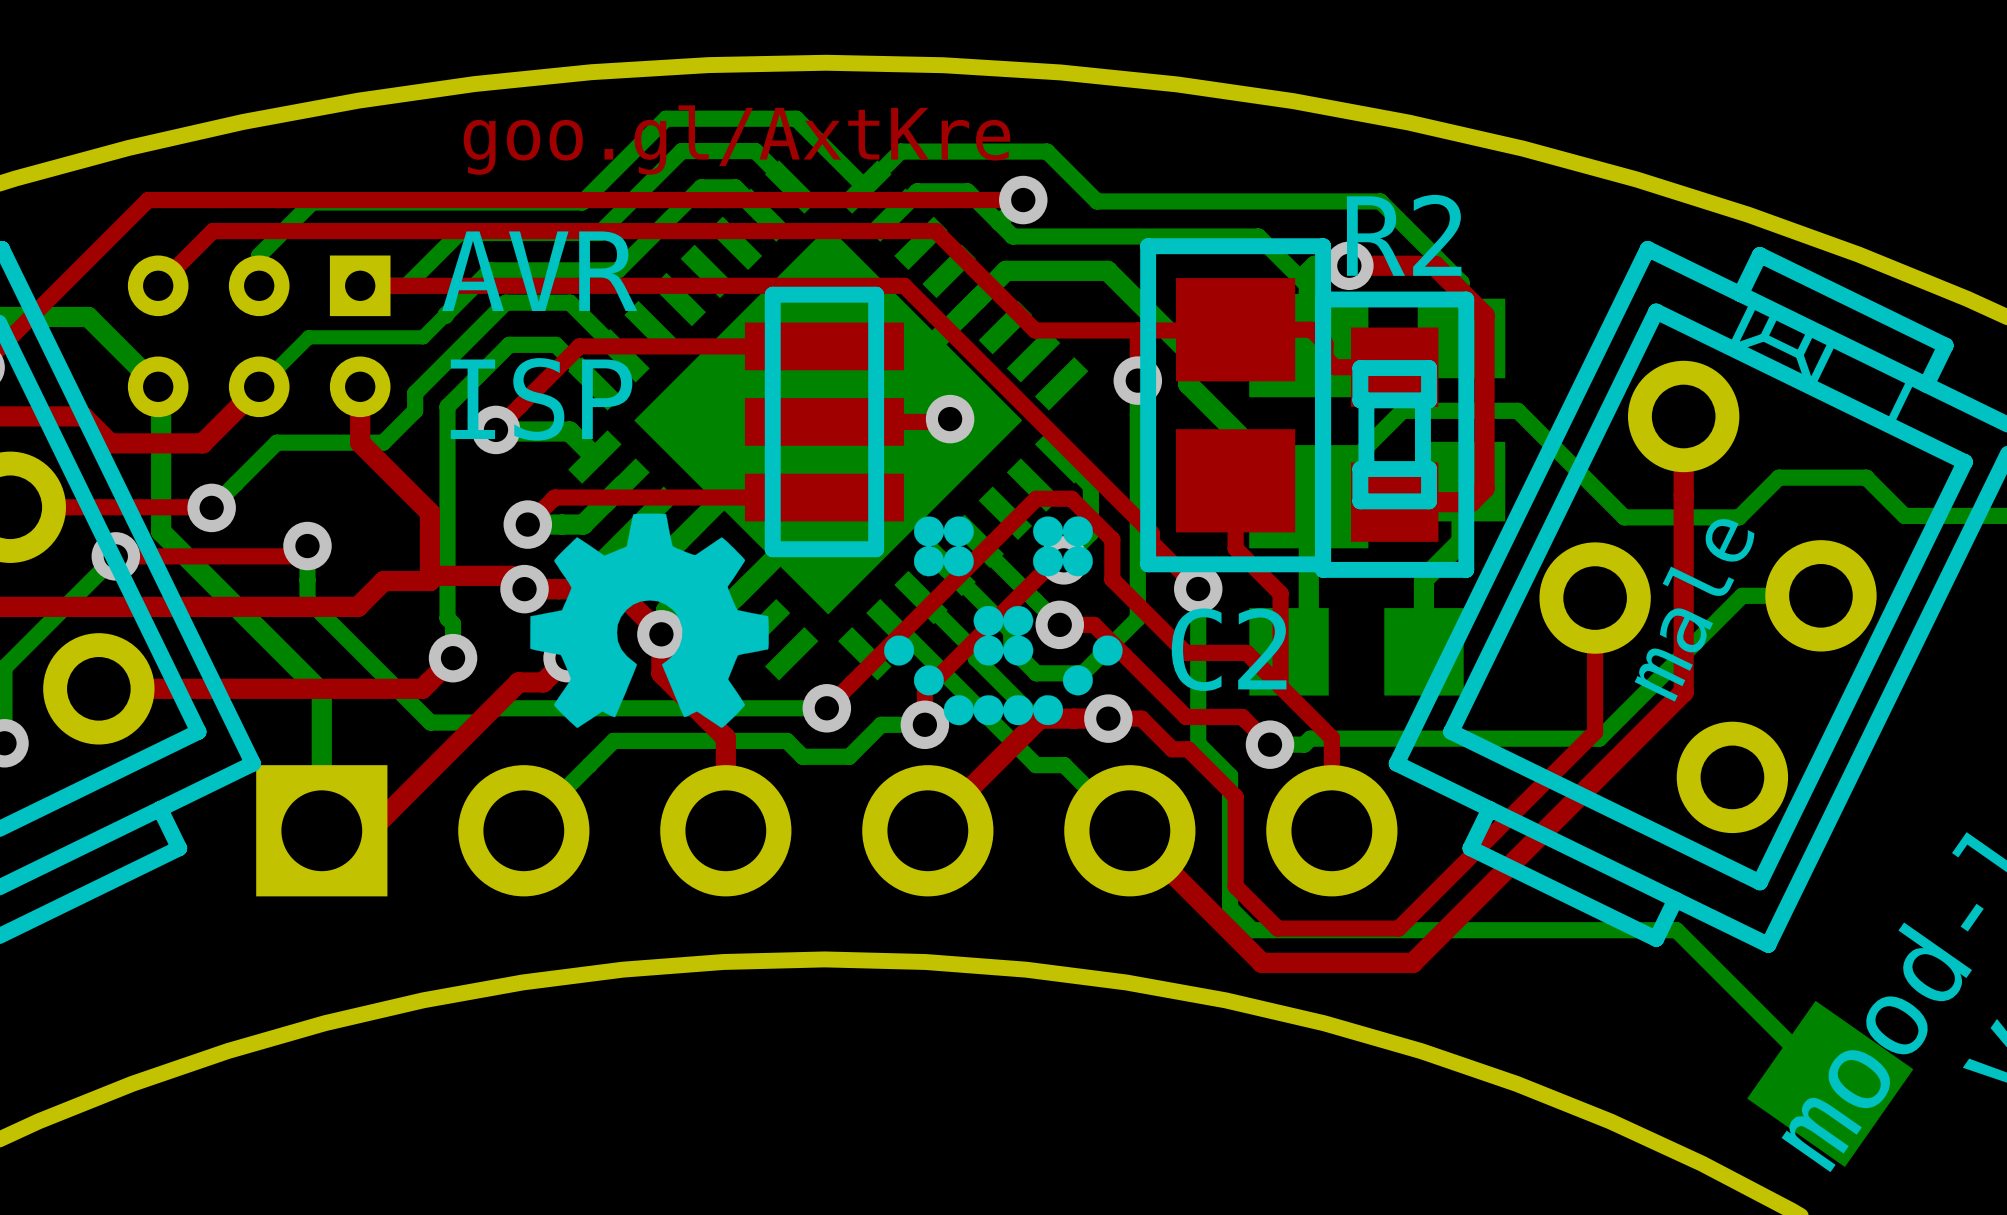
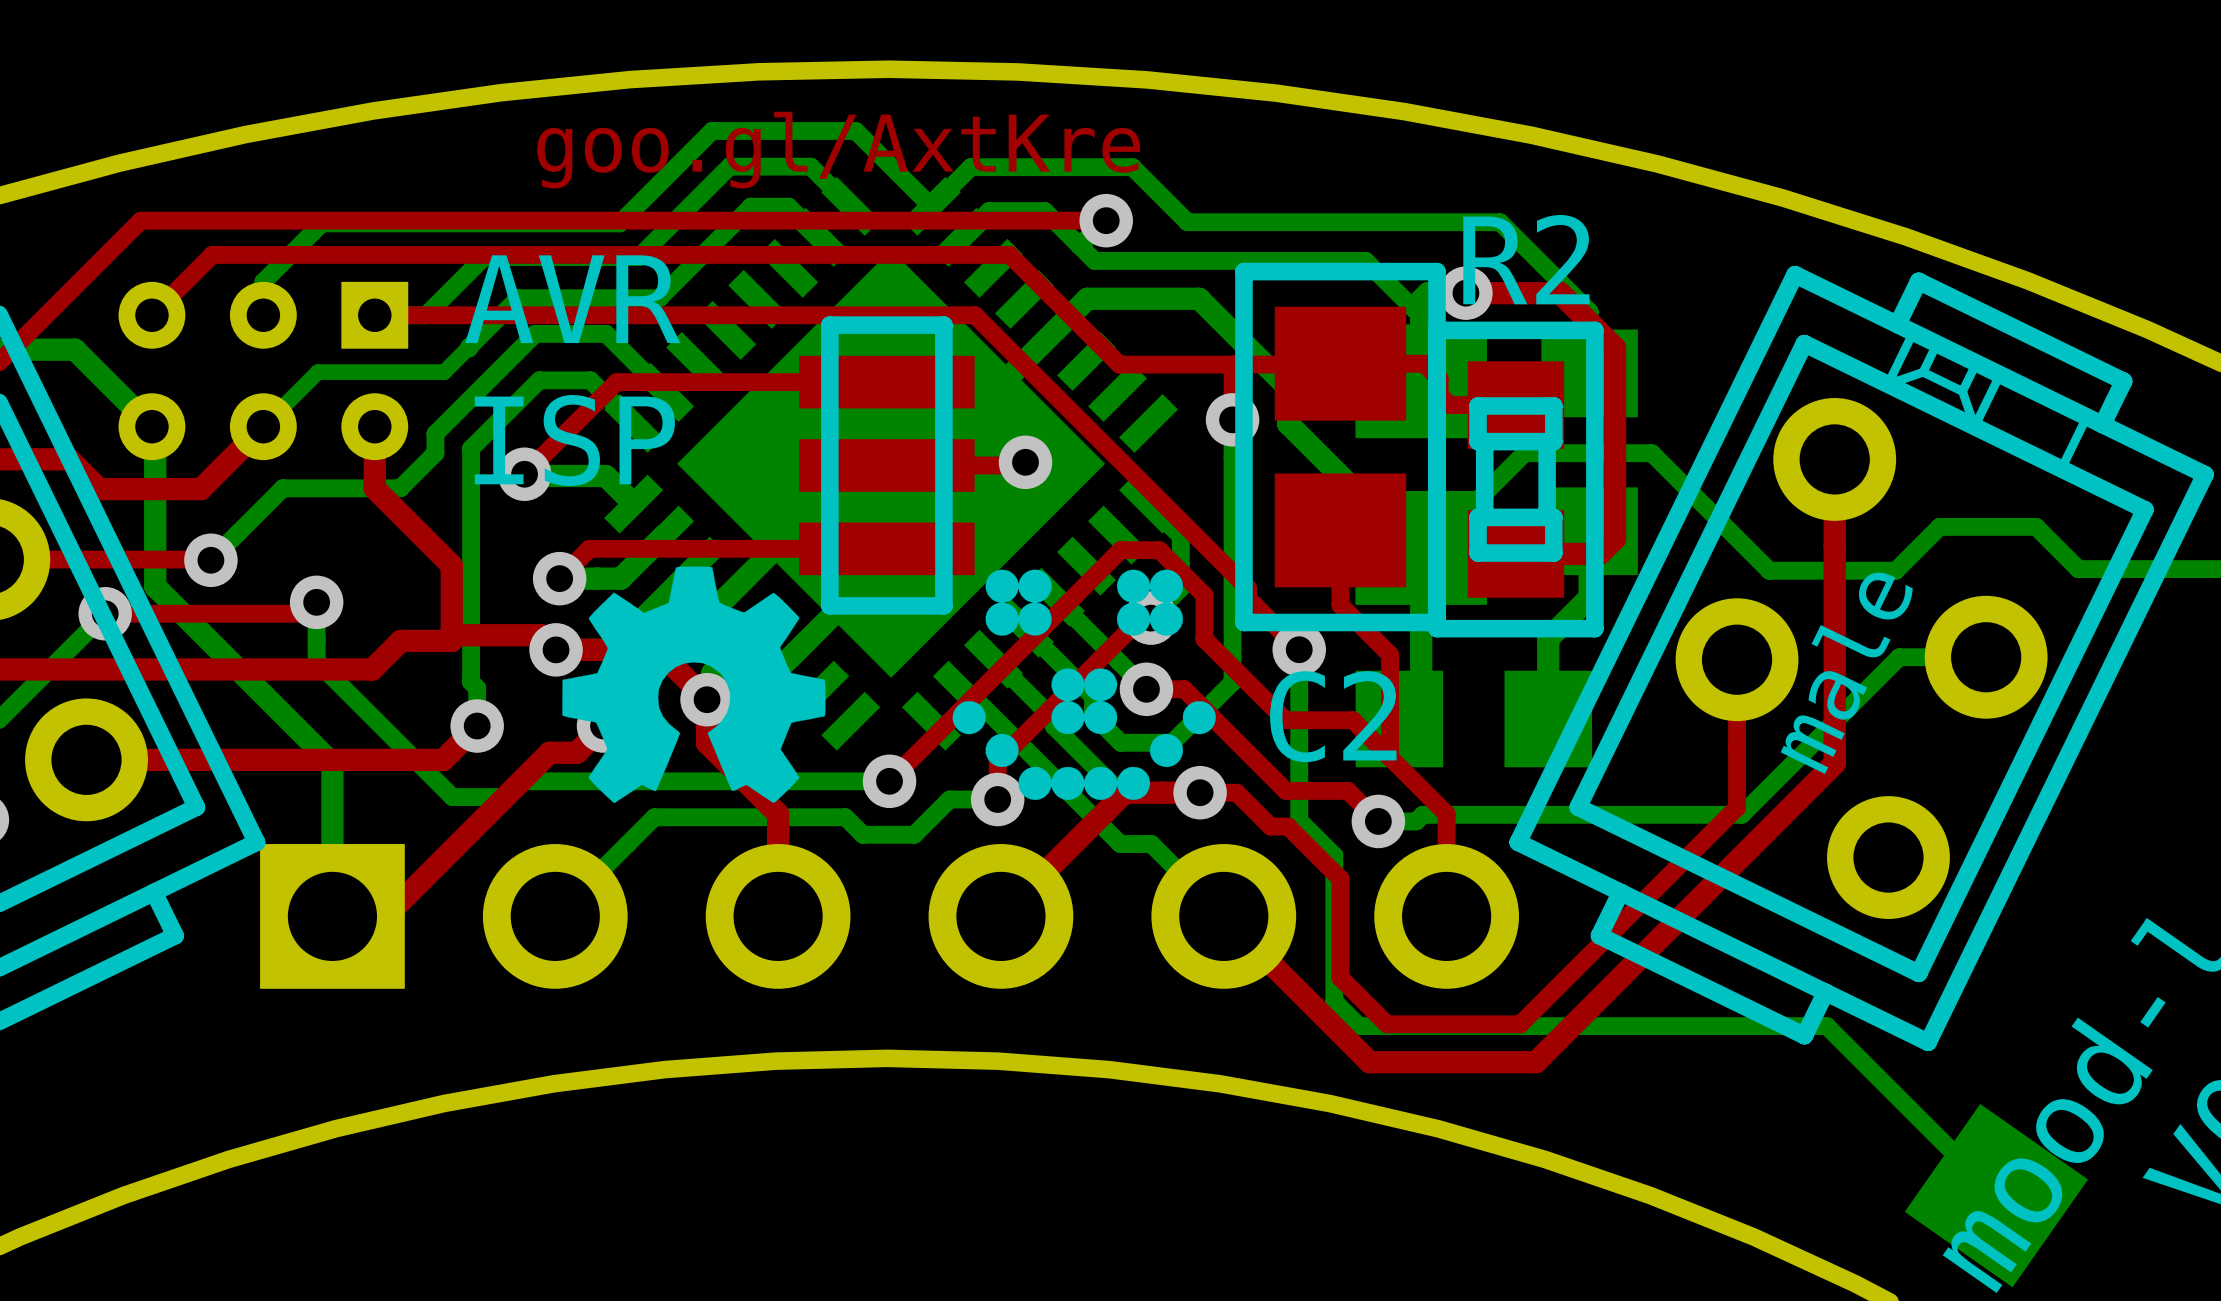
text position: goo.gl/AxtKre (737, 140) -> goo.gl/AxtKre (838, 150)

